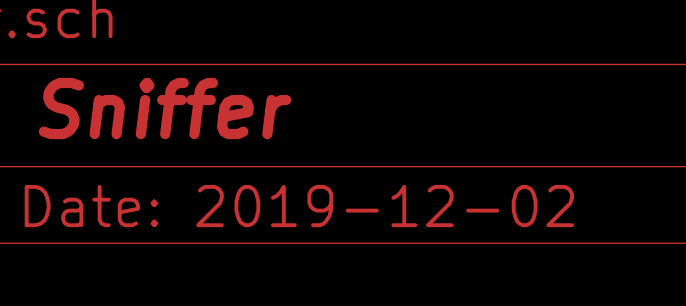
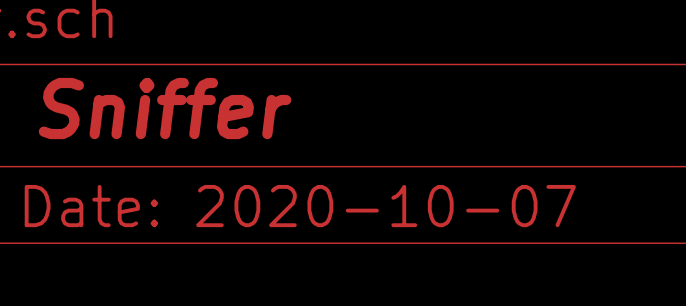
title block: Date: 2019-12-02 (299, 206) -> Date: 2020-10-07 (300, 206)

